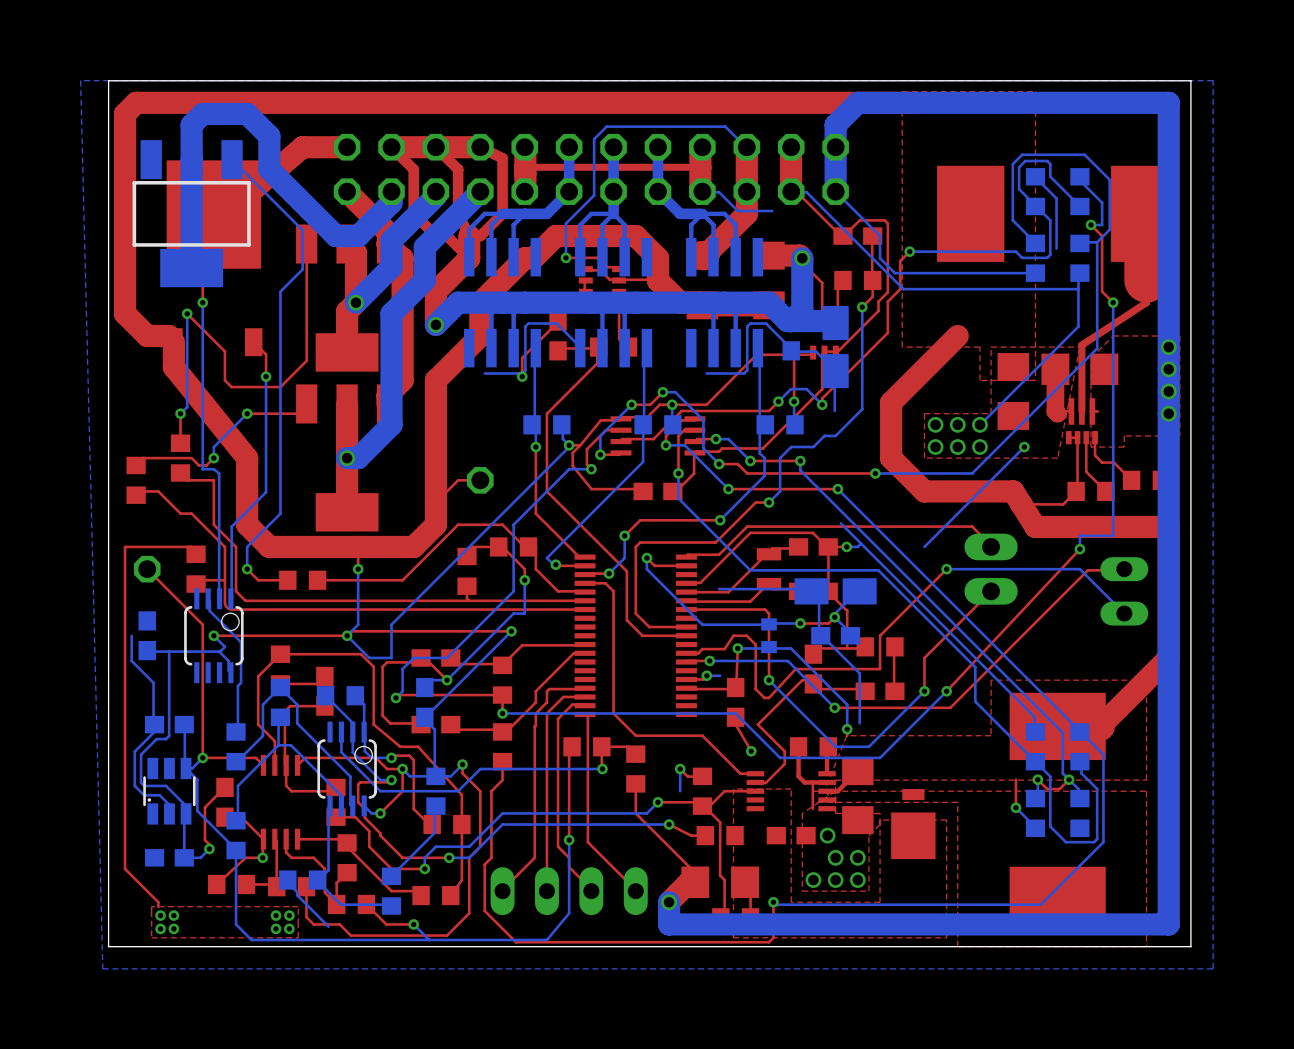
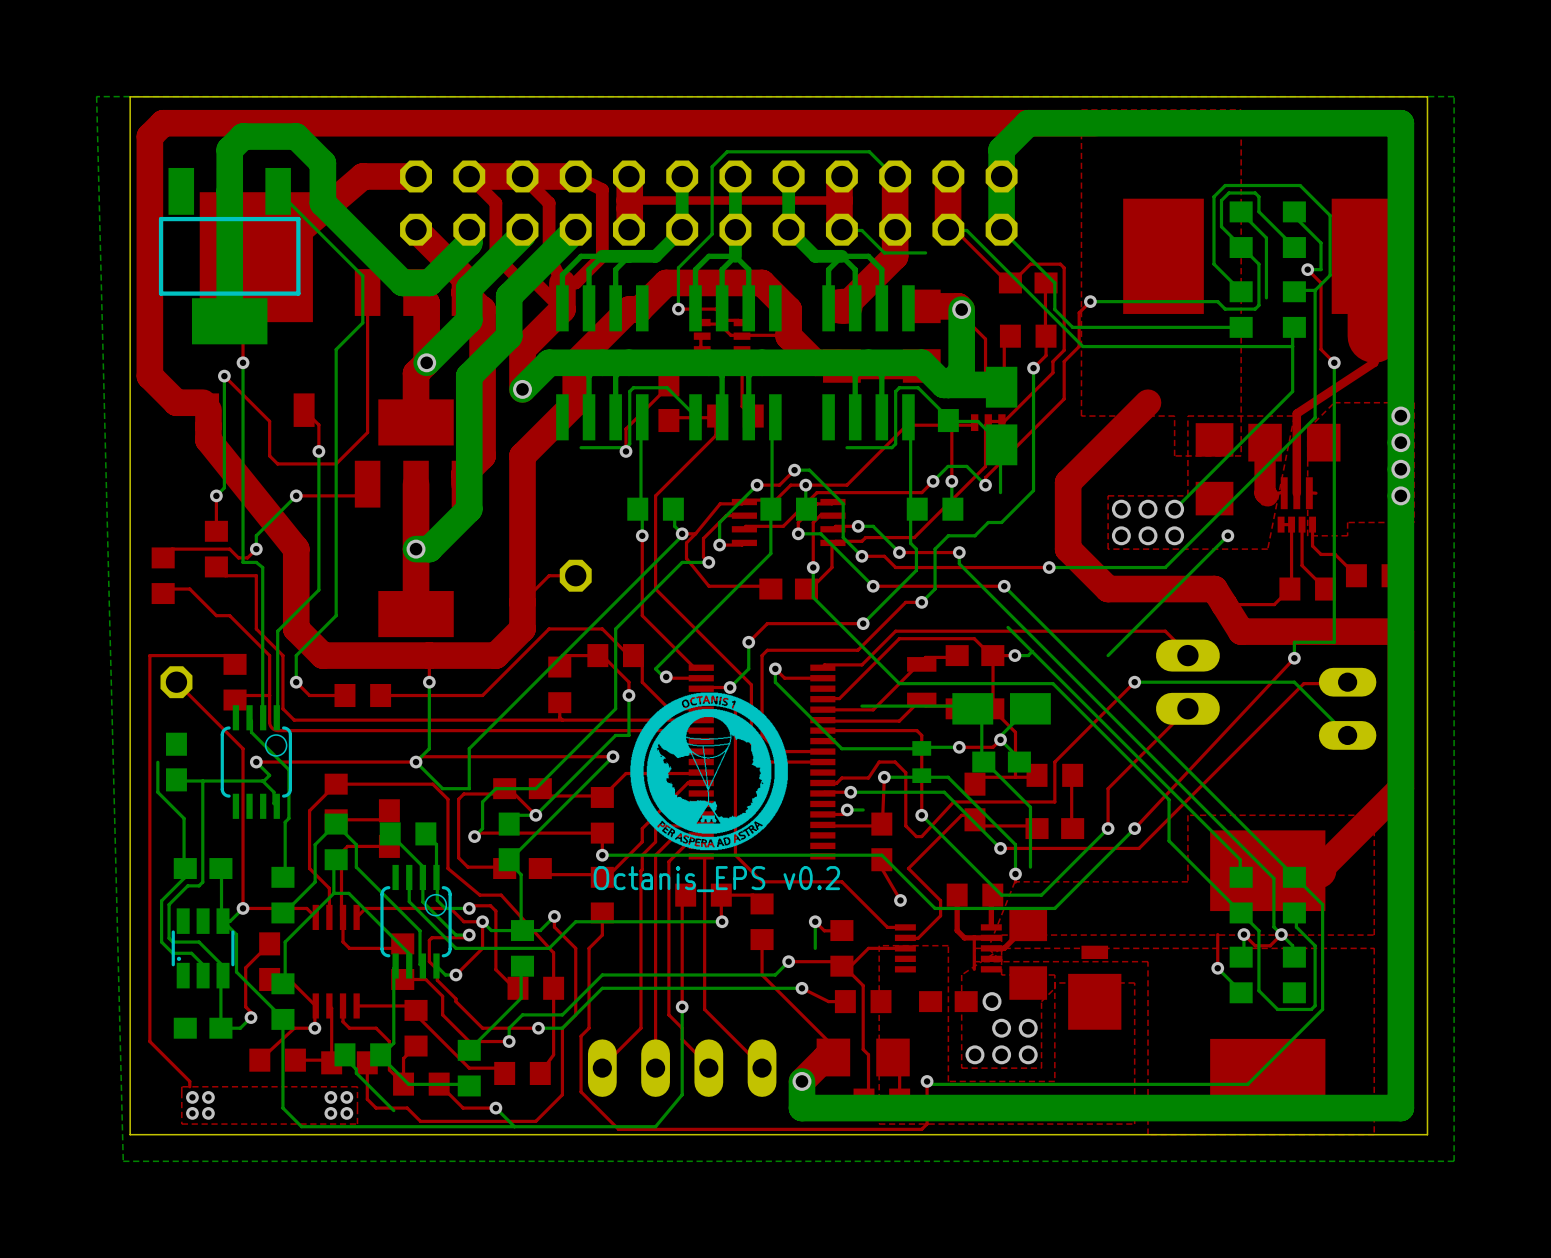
drawing: none -> [630, 692, 788, 851]
text: none -> Octanis_EPS v0.2 (716, 879)

